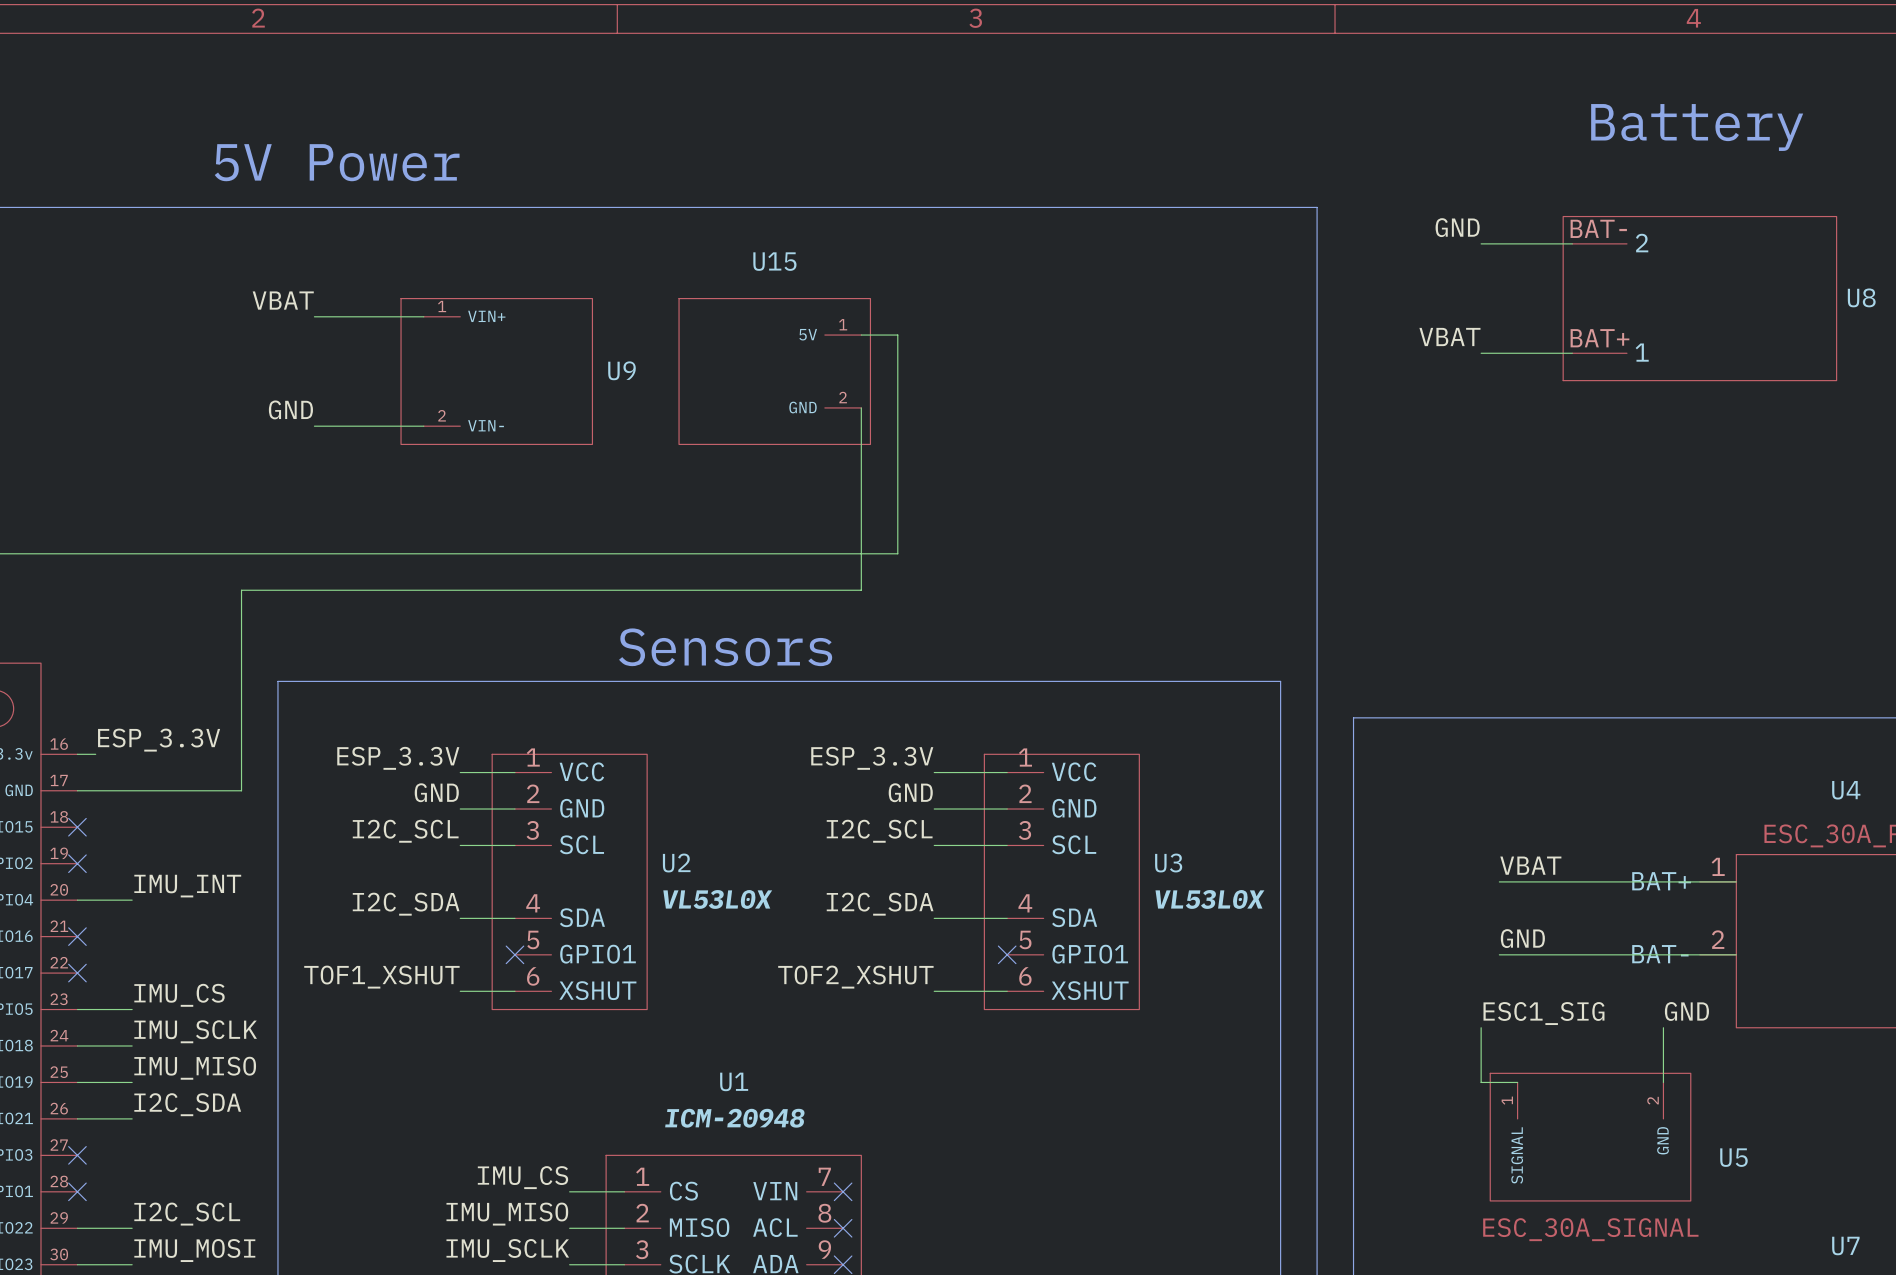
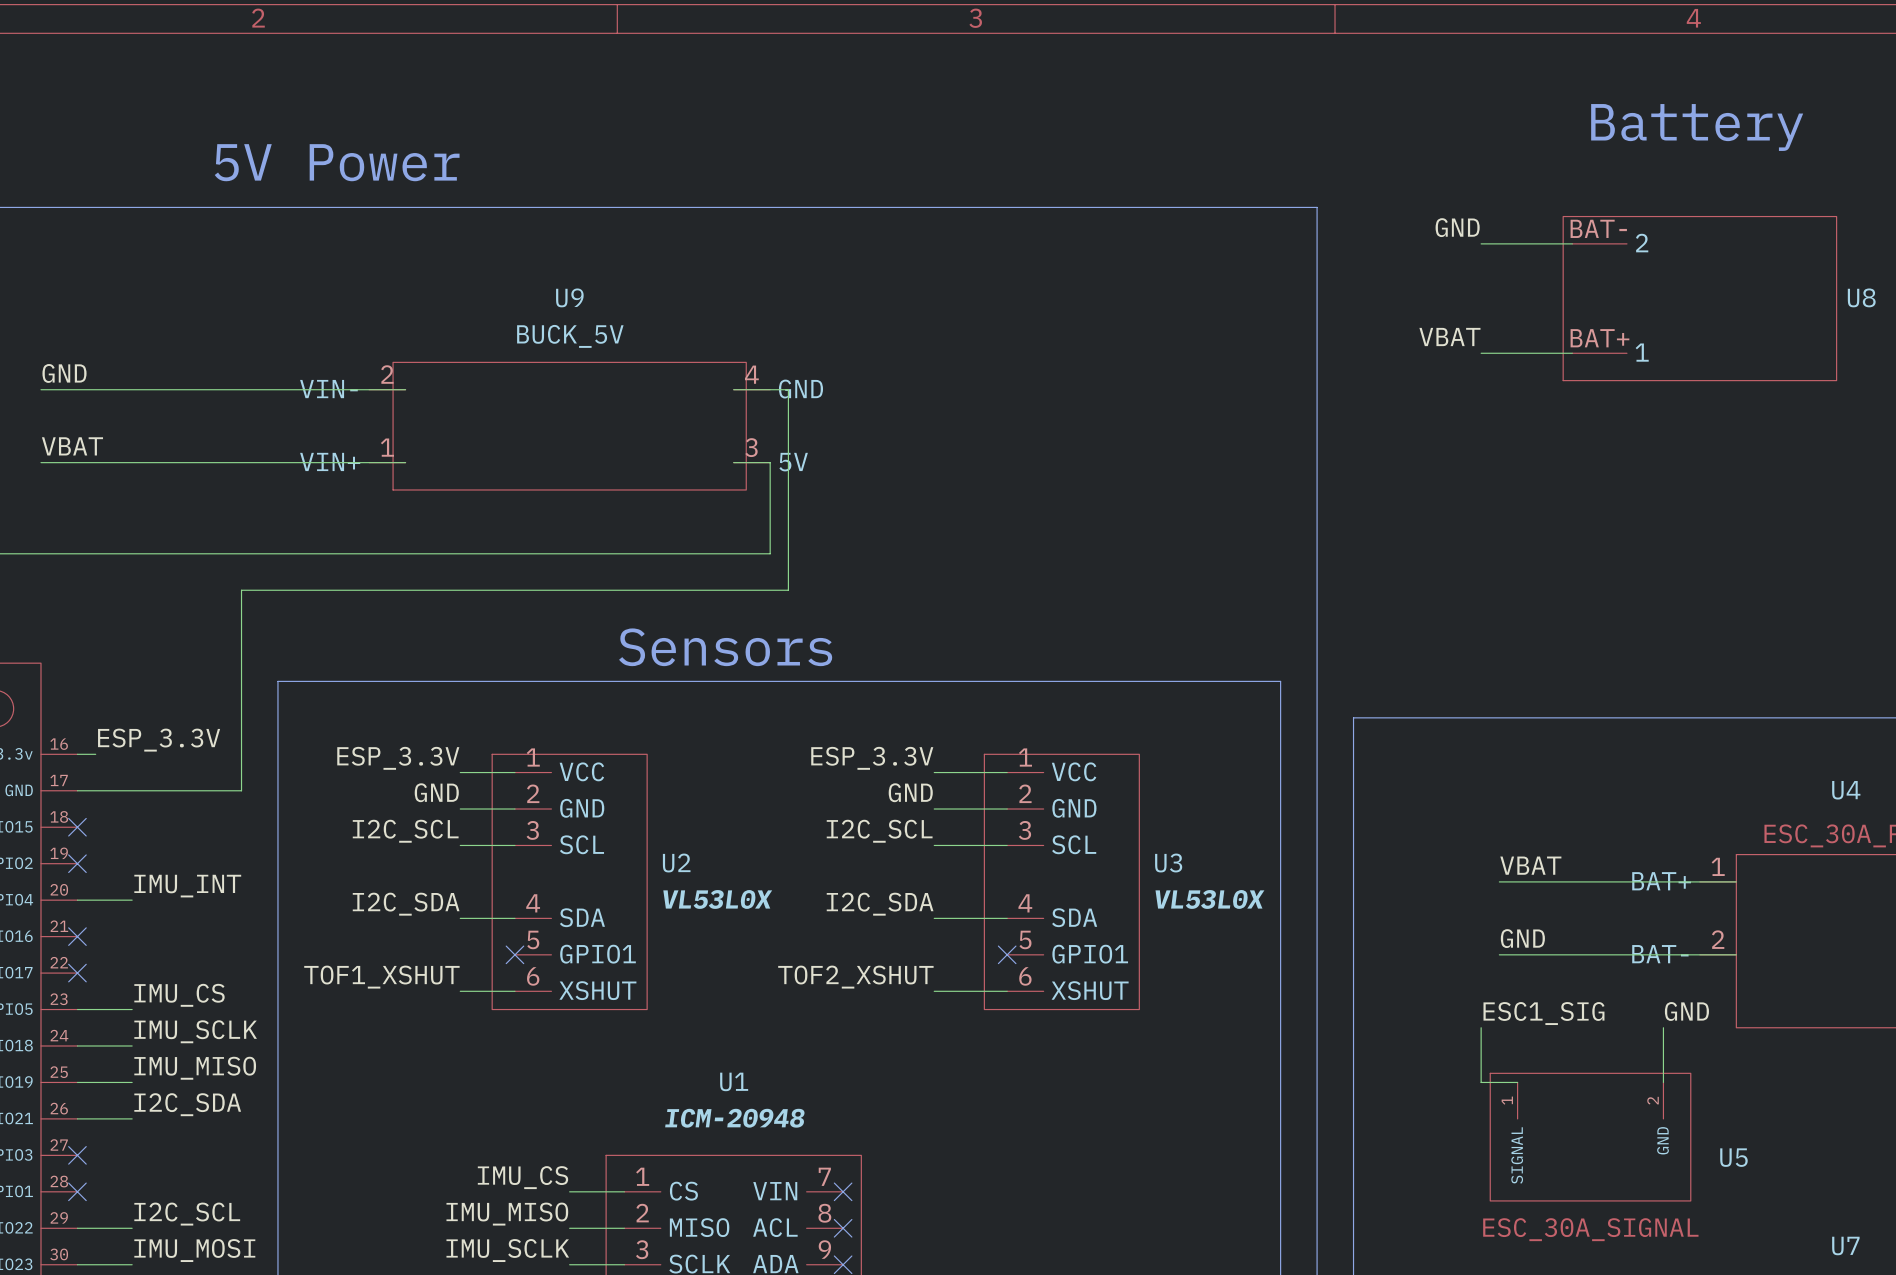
U9 symbol: [401, 298, 593, 445] -> [369, 362, 771, 490]
label position: VBAT (283, 300) -> VBAT (72, 446)
wire: (314, 316) (423, 316) -> none
wire: (861, 335) (897, 335) (897, 553) (770, 553) -> (733, 462) (770, 462) (770, 553)
U9 value: none -> BUCK_5V (570, 336)
U9 name position: U9 (621, 370) -> U9 (569, 297)
U15: (774, 371) -> none
wire: none -> (40, 389) (405, 389)
wire: (861, 407) (861, 590) (788, 590) -> (733, 389) (788, 389) (788, 590)
label position: GND (290, 409) -> GND (64, 373)
wire: (314, 426) (423, 426) -> none
wire: none -> (40, 462) (405, 462)

